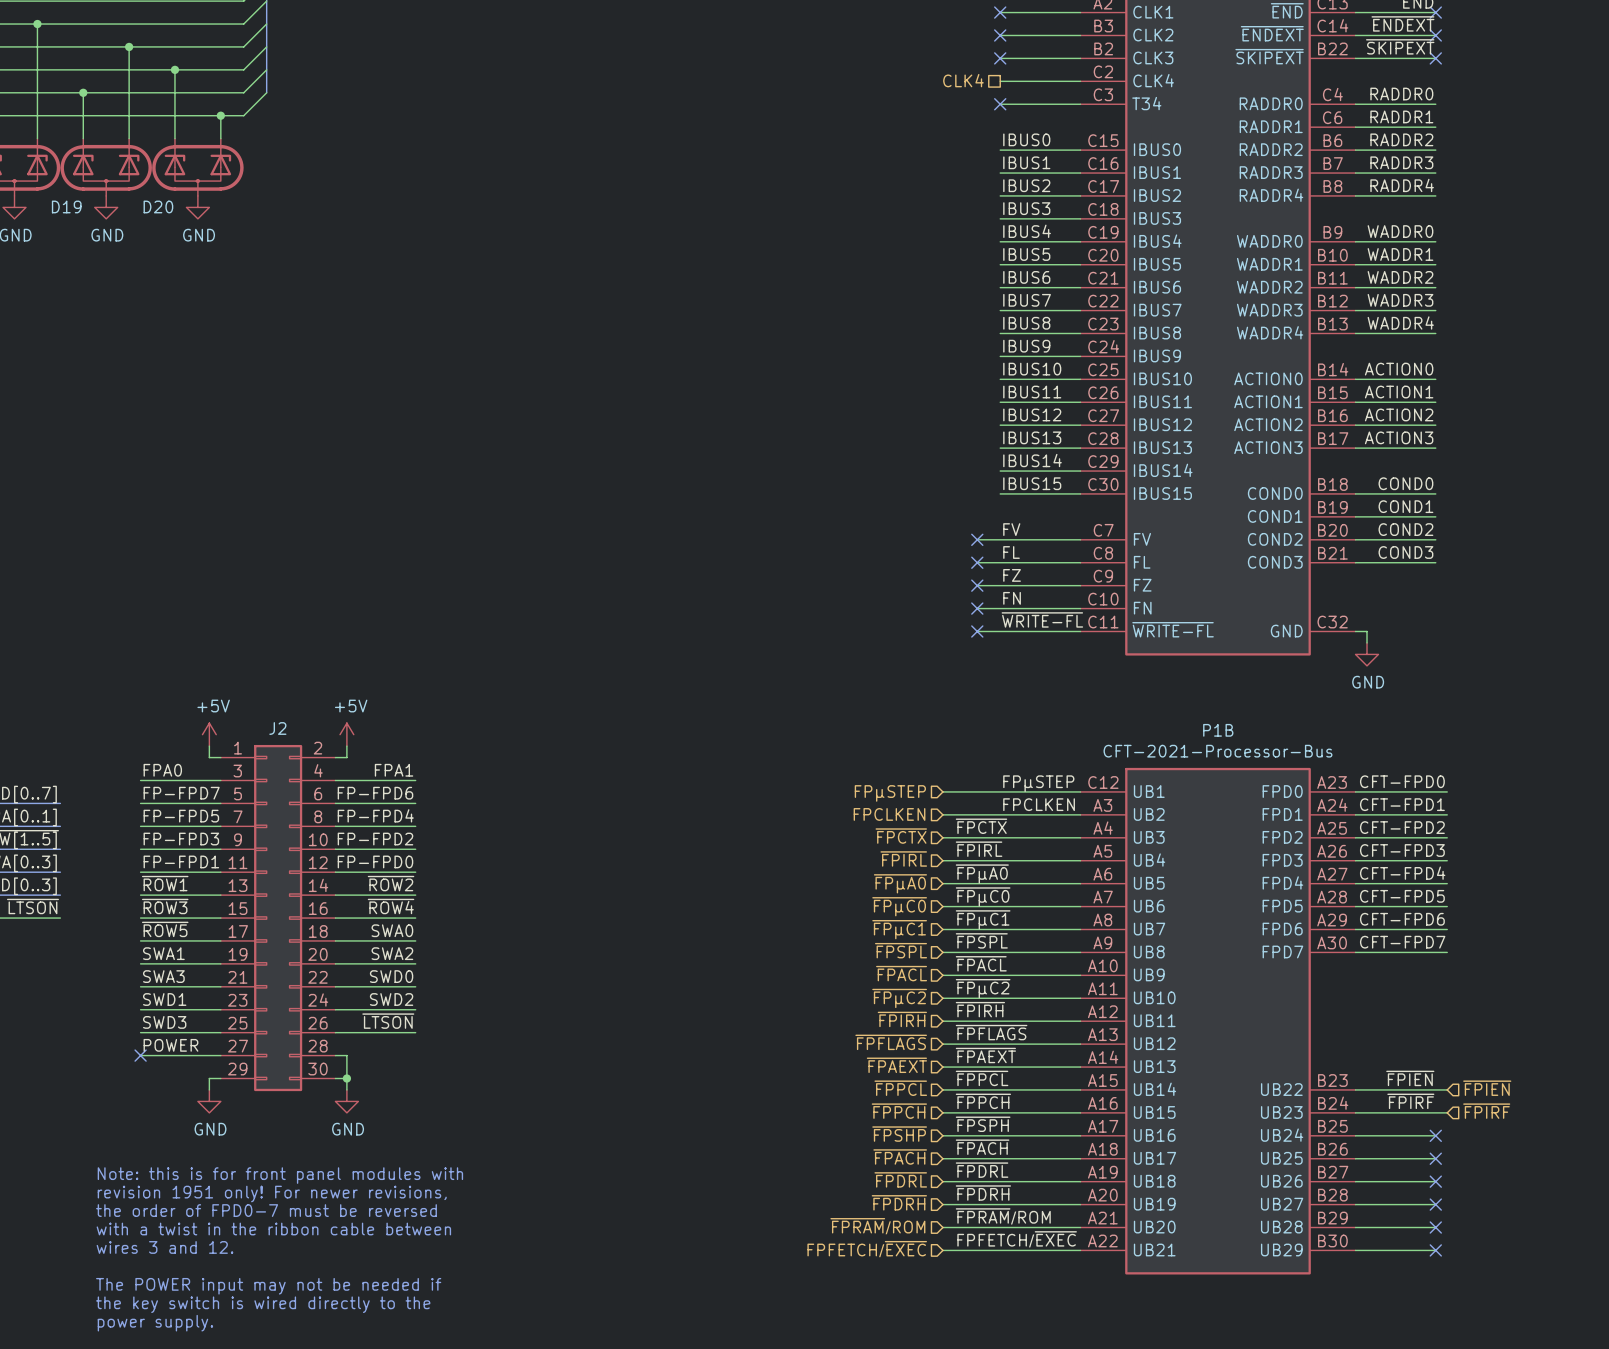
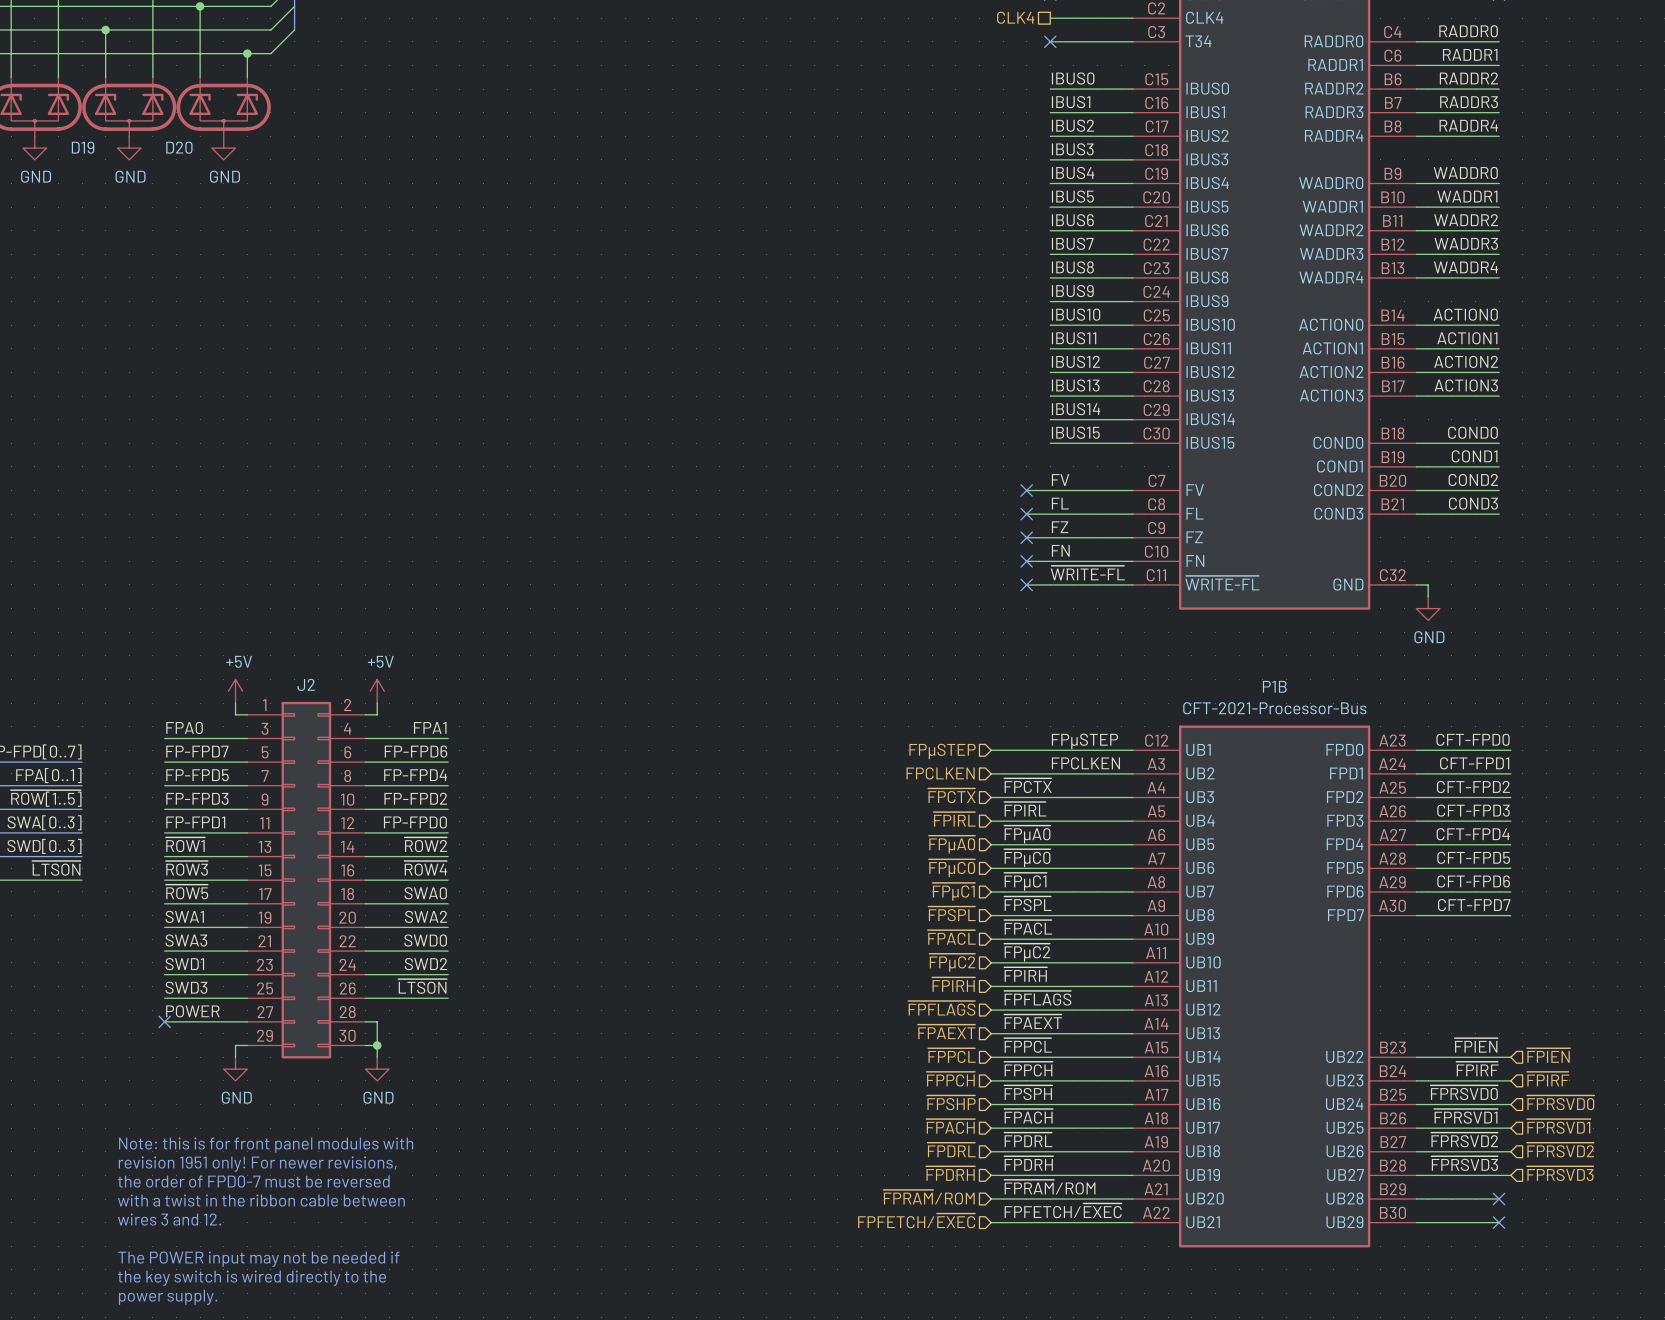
label: none -> ~{FPRSVD0} (1464, 1092)
hierarchical label: none -> ~{FPRSVD0} (1560, 1102)
wire: none -> (1499, 1104) (1510, 1104)
no-connect mark: (1435, 1135) -> none
label: none -> ~{FPRSVD1} (1465, 1116)
hierarchical label: none -> ~{FPRSVD1} (1558, 1126)
wire: none -> (1499, 1128) (1510, 1128)
no-connect mark: (1435, 1158) -> none
label: none -> ~{FPRSVD2} (1464, 1139)
hierarchical label: none -> ~{FPRSVD2} (1560, 1150)
wire: none -> (1499, 1151) (1510, 1151)
no-connect mark: (1435, 1181) -> none
label: none -> ~{FPRSVD3} (1464, 1163)
hierarchical label: none -> ~{FPRSVD3} (1560, 1173)
wire: none -> (1499, 1175) (1510, 1175)
no-connect mark: (1435, 1204) -> none

